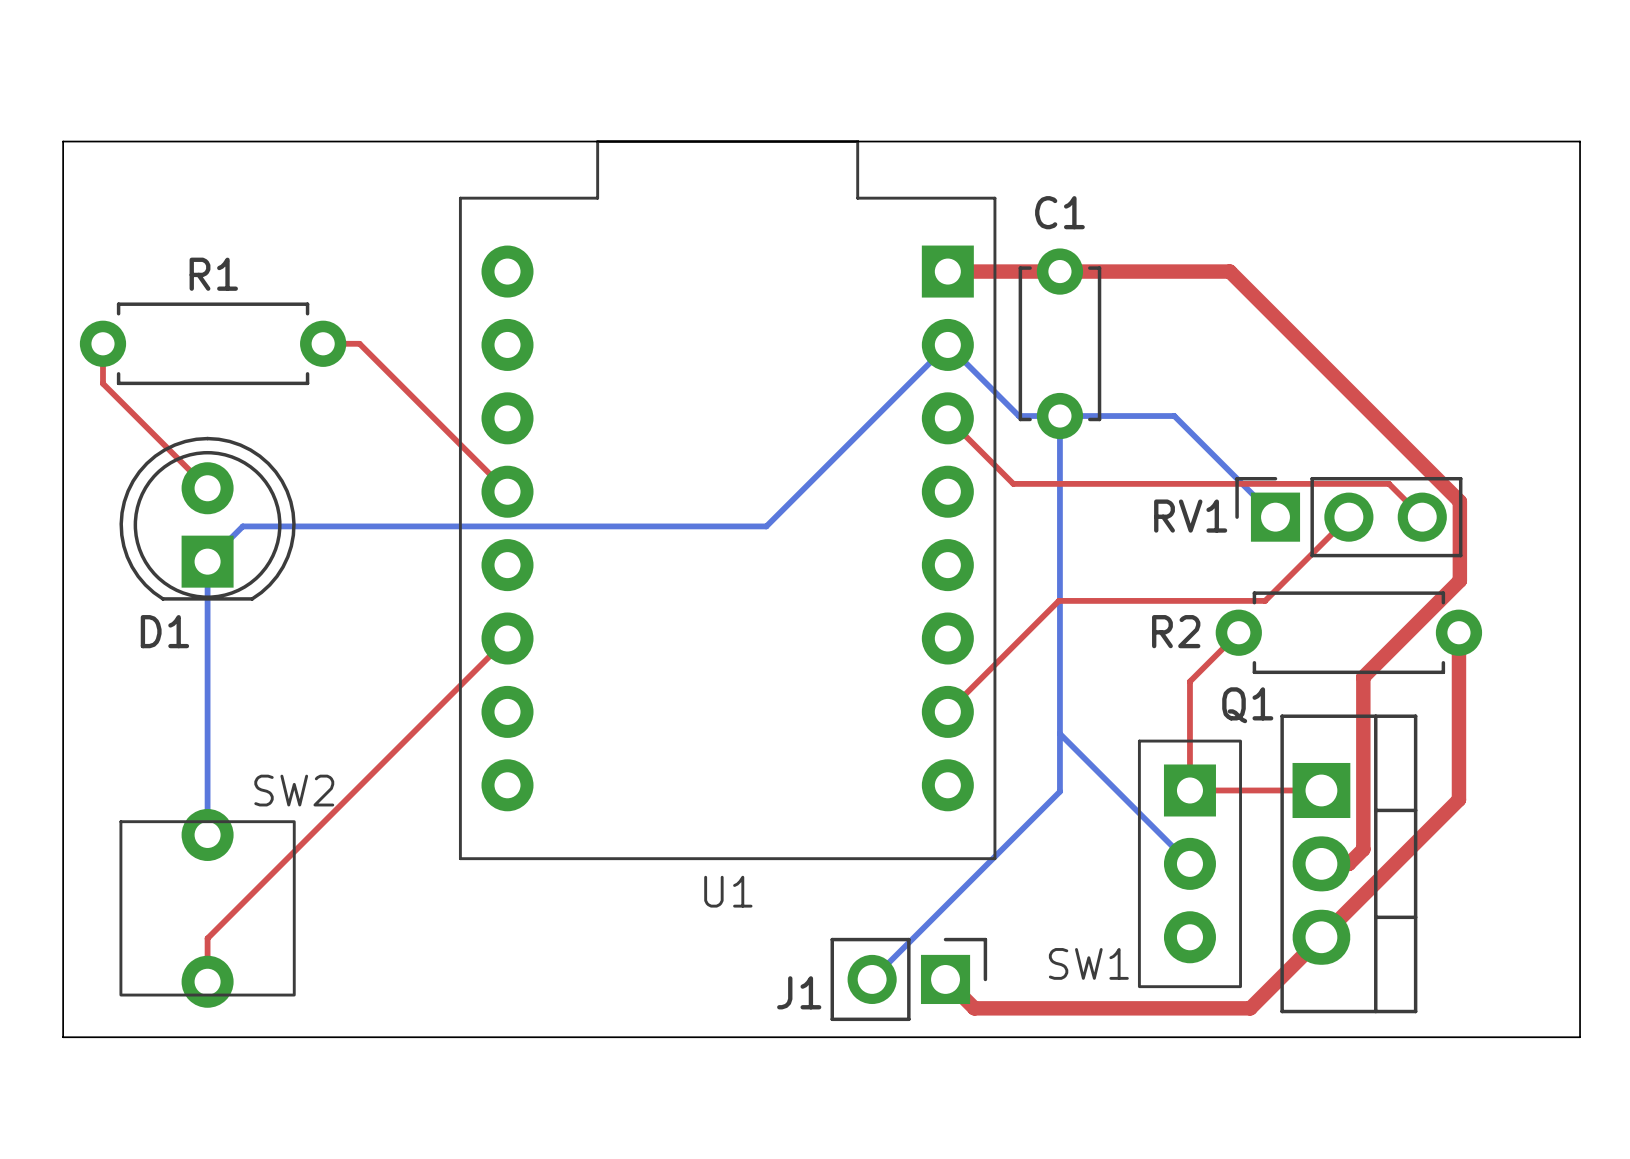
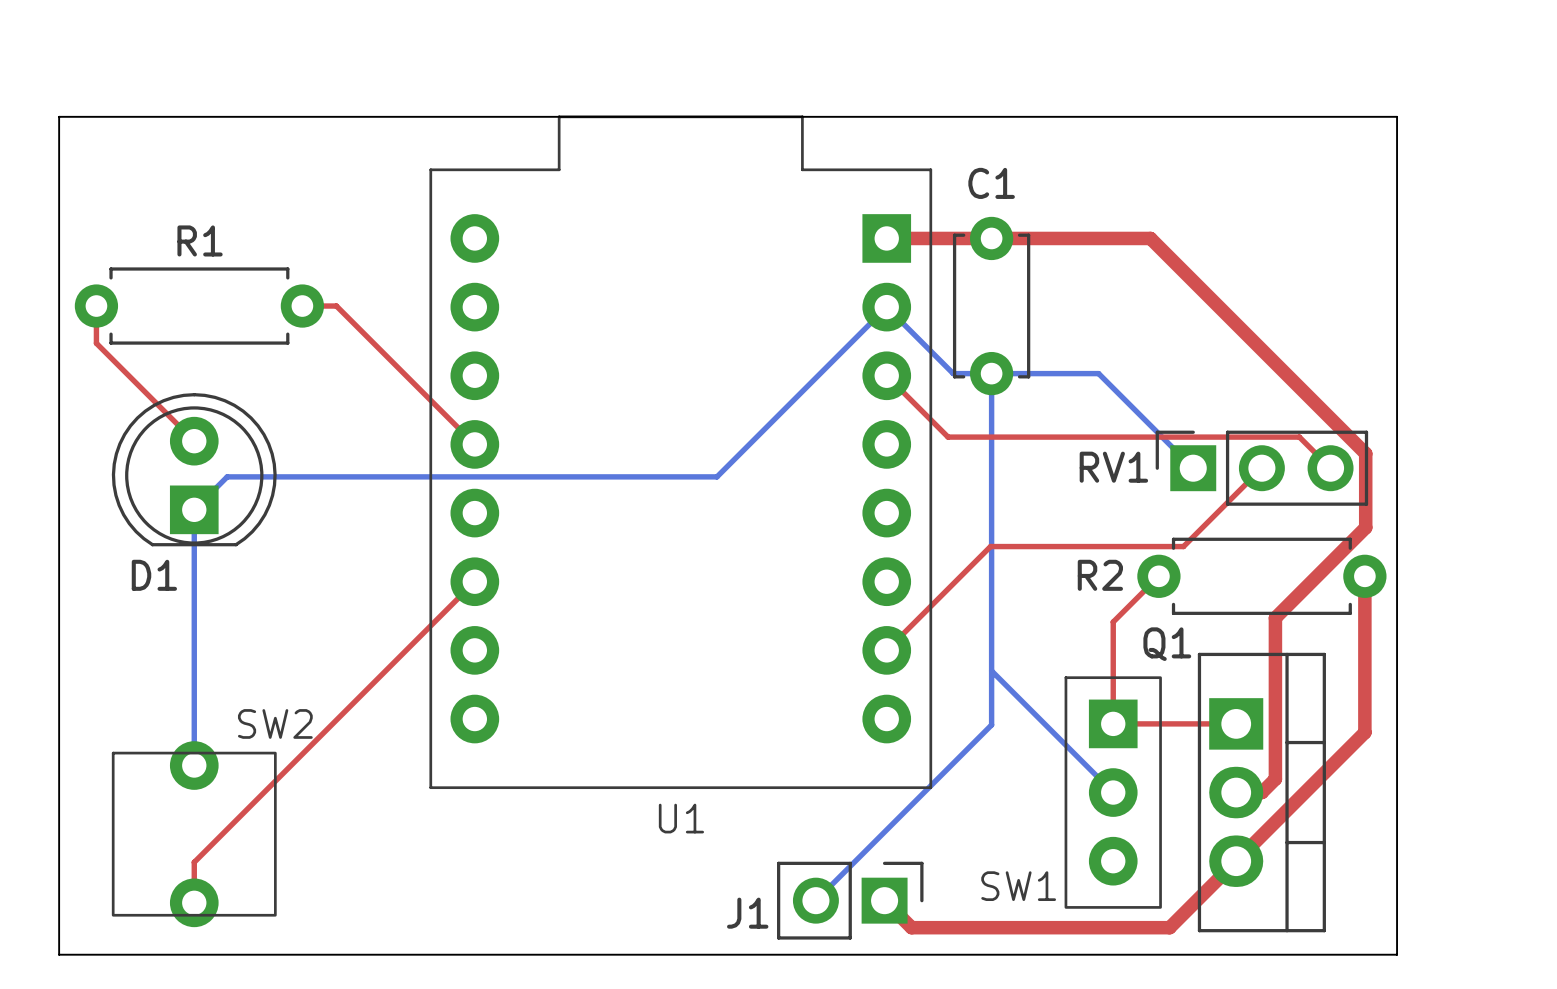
board edge: (1493, 141) (1580, 141) (1580, 1037) (1493, 1037) -> (1397, 116) (1397, 954)

